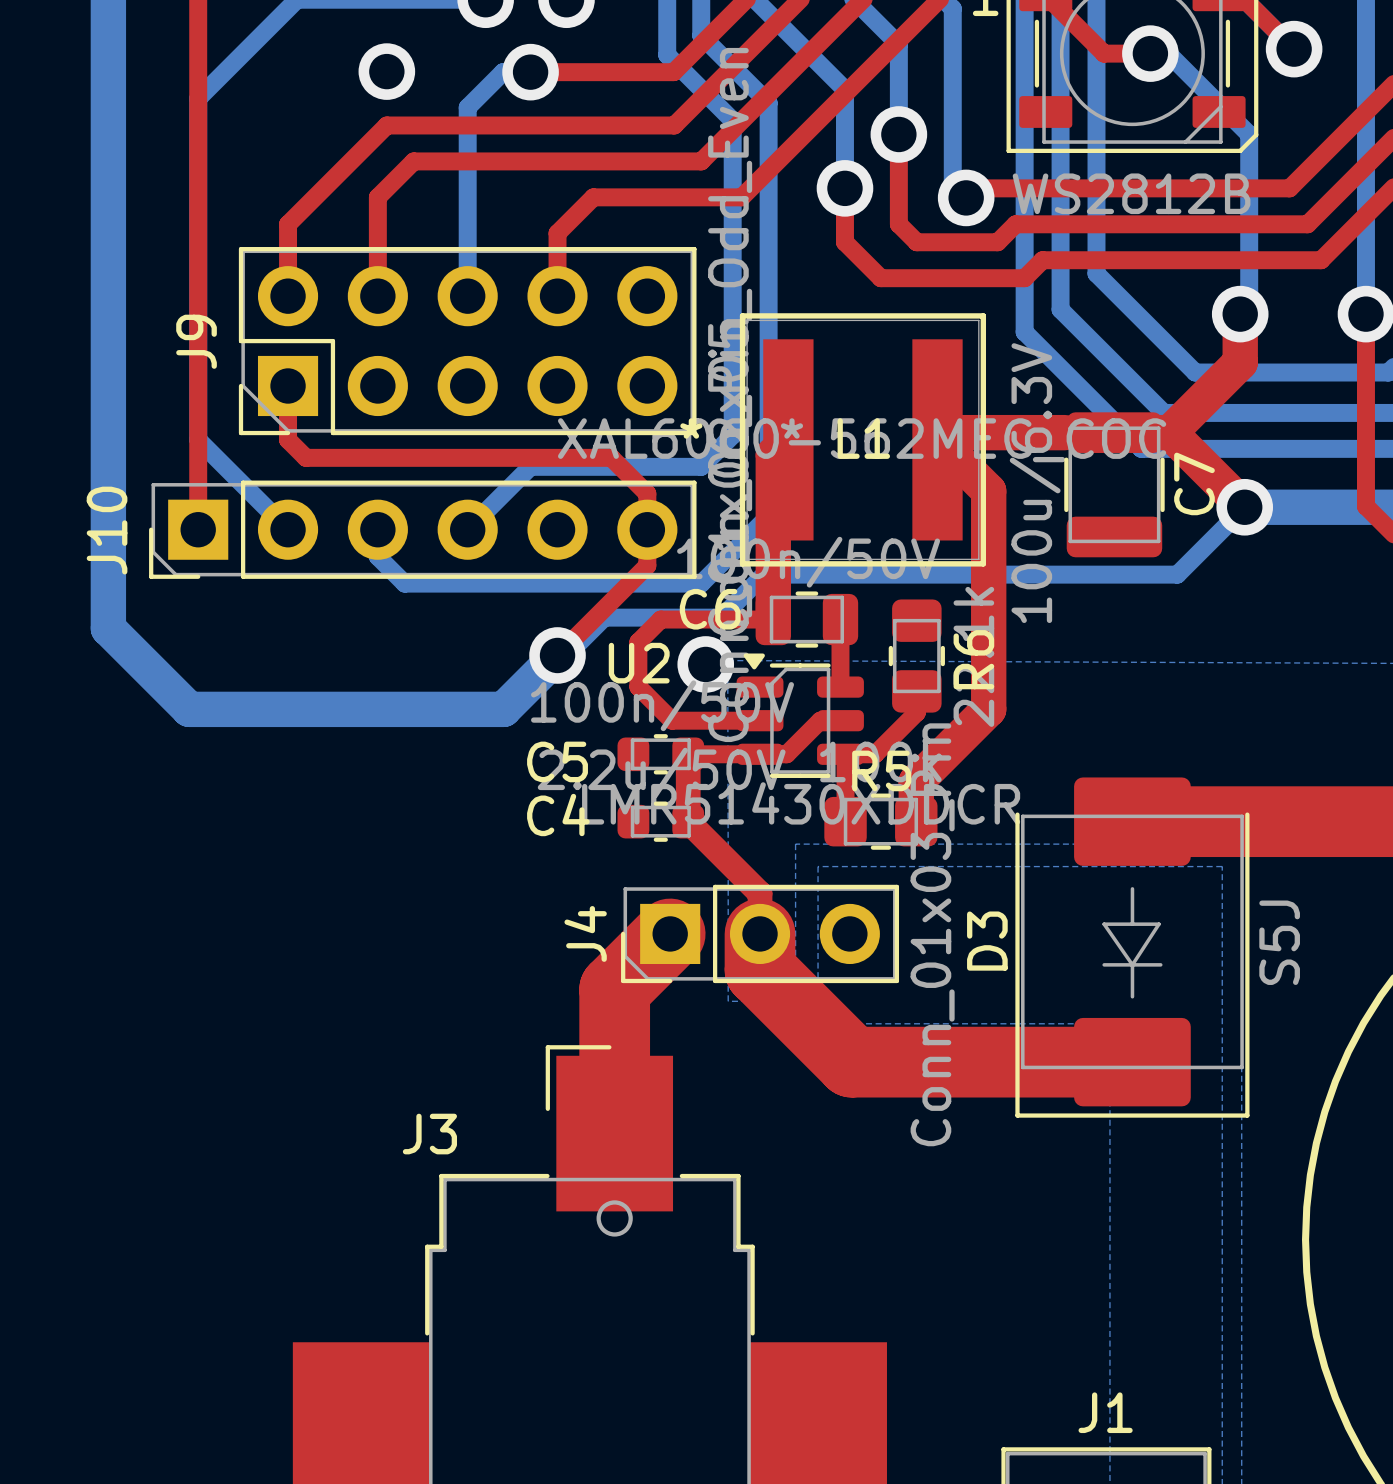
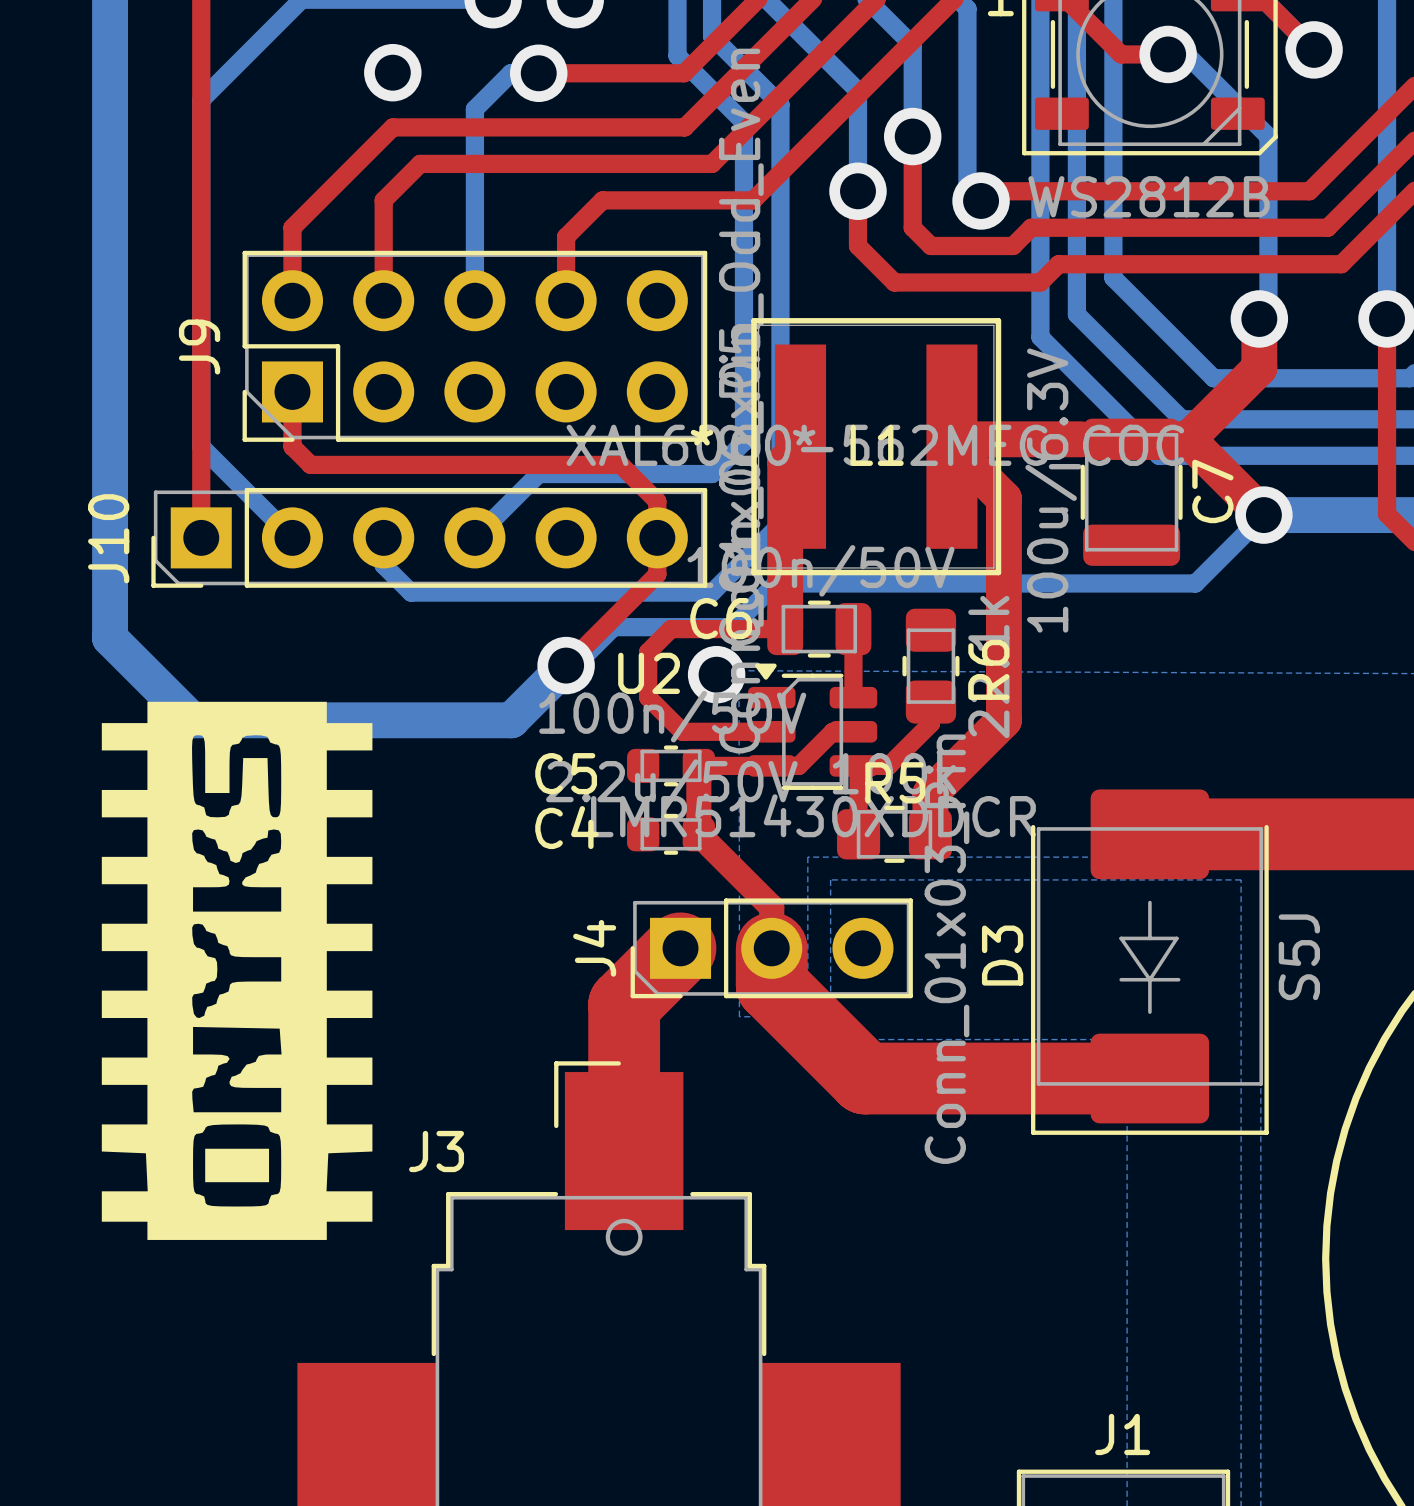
drawing: none -> [101, 701, 373, 1240]

